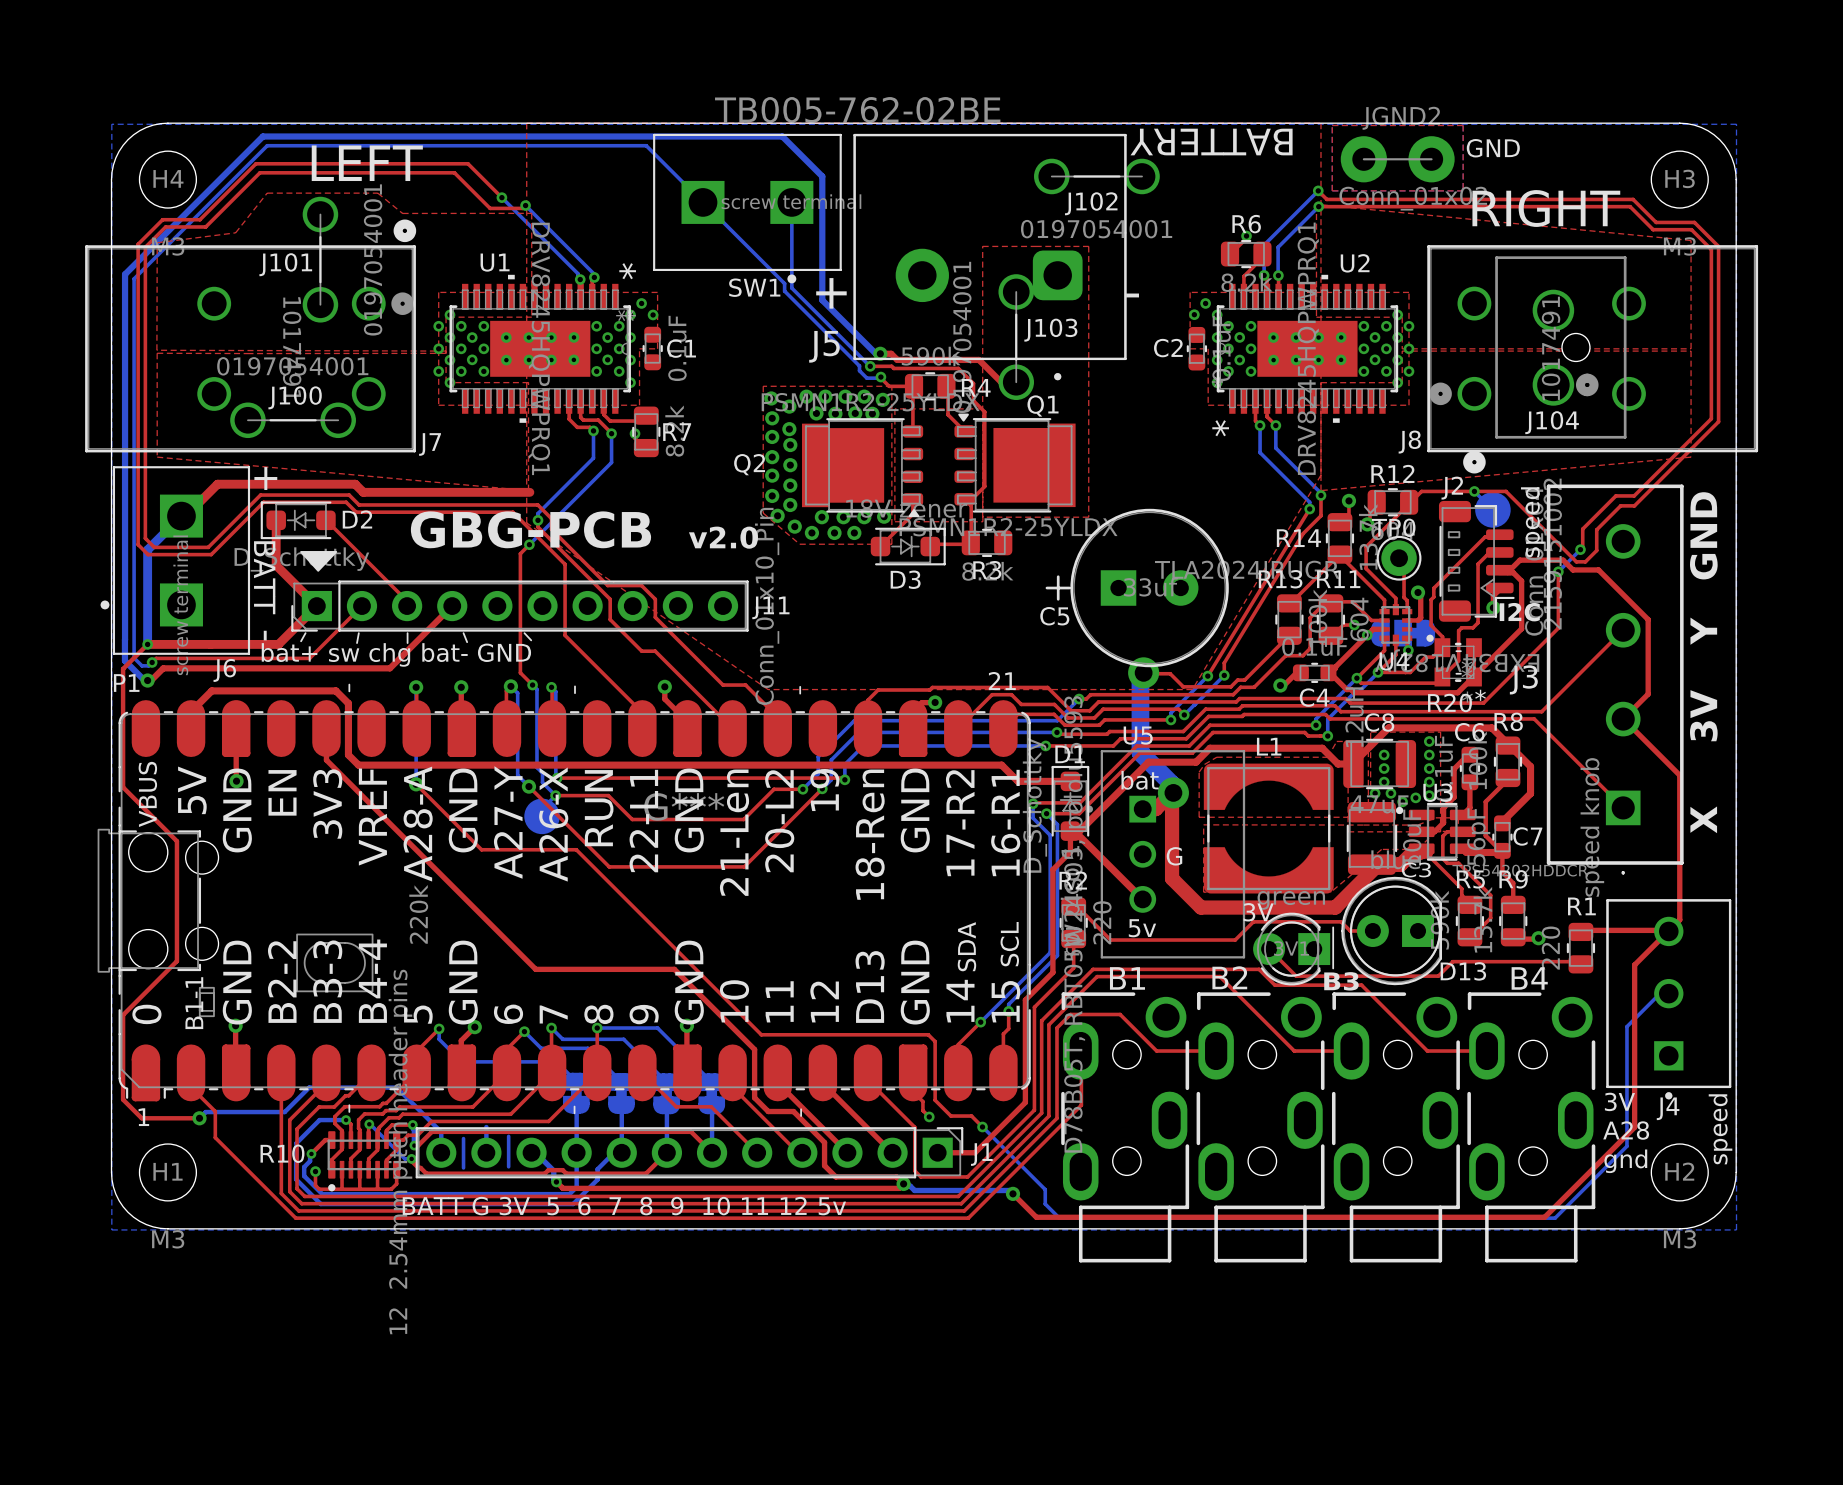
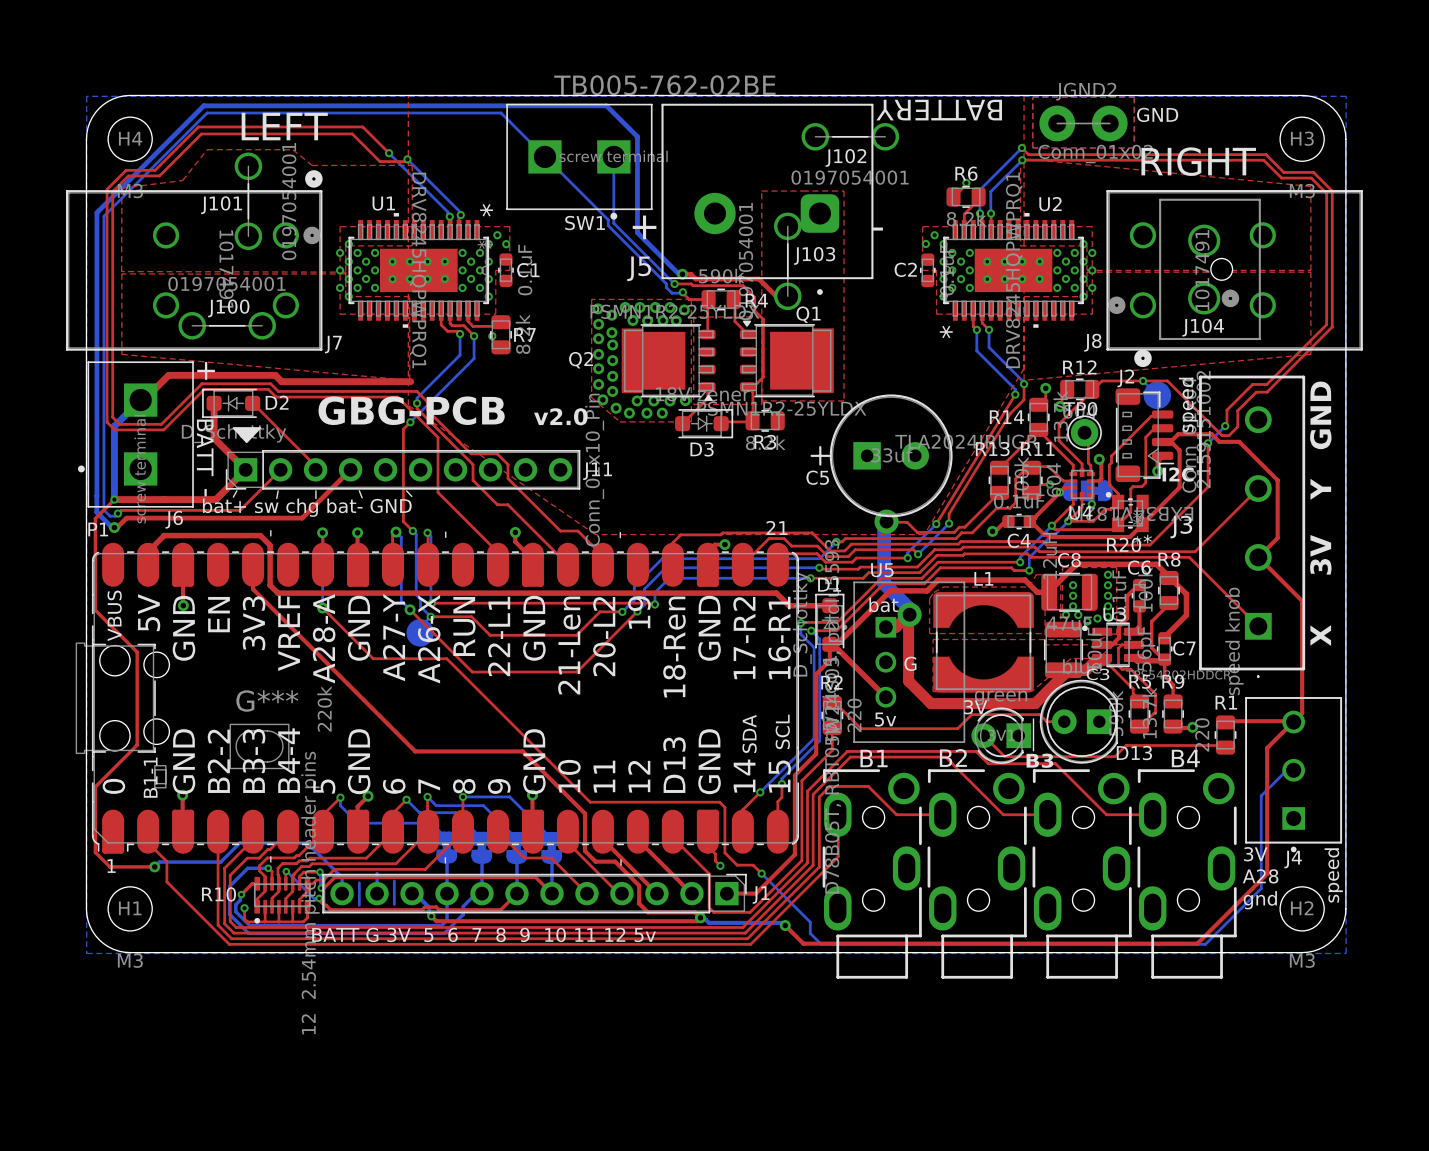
G*** position: (684, 806) -> (267, 701)

